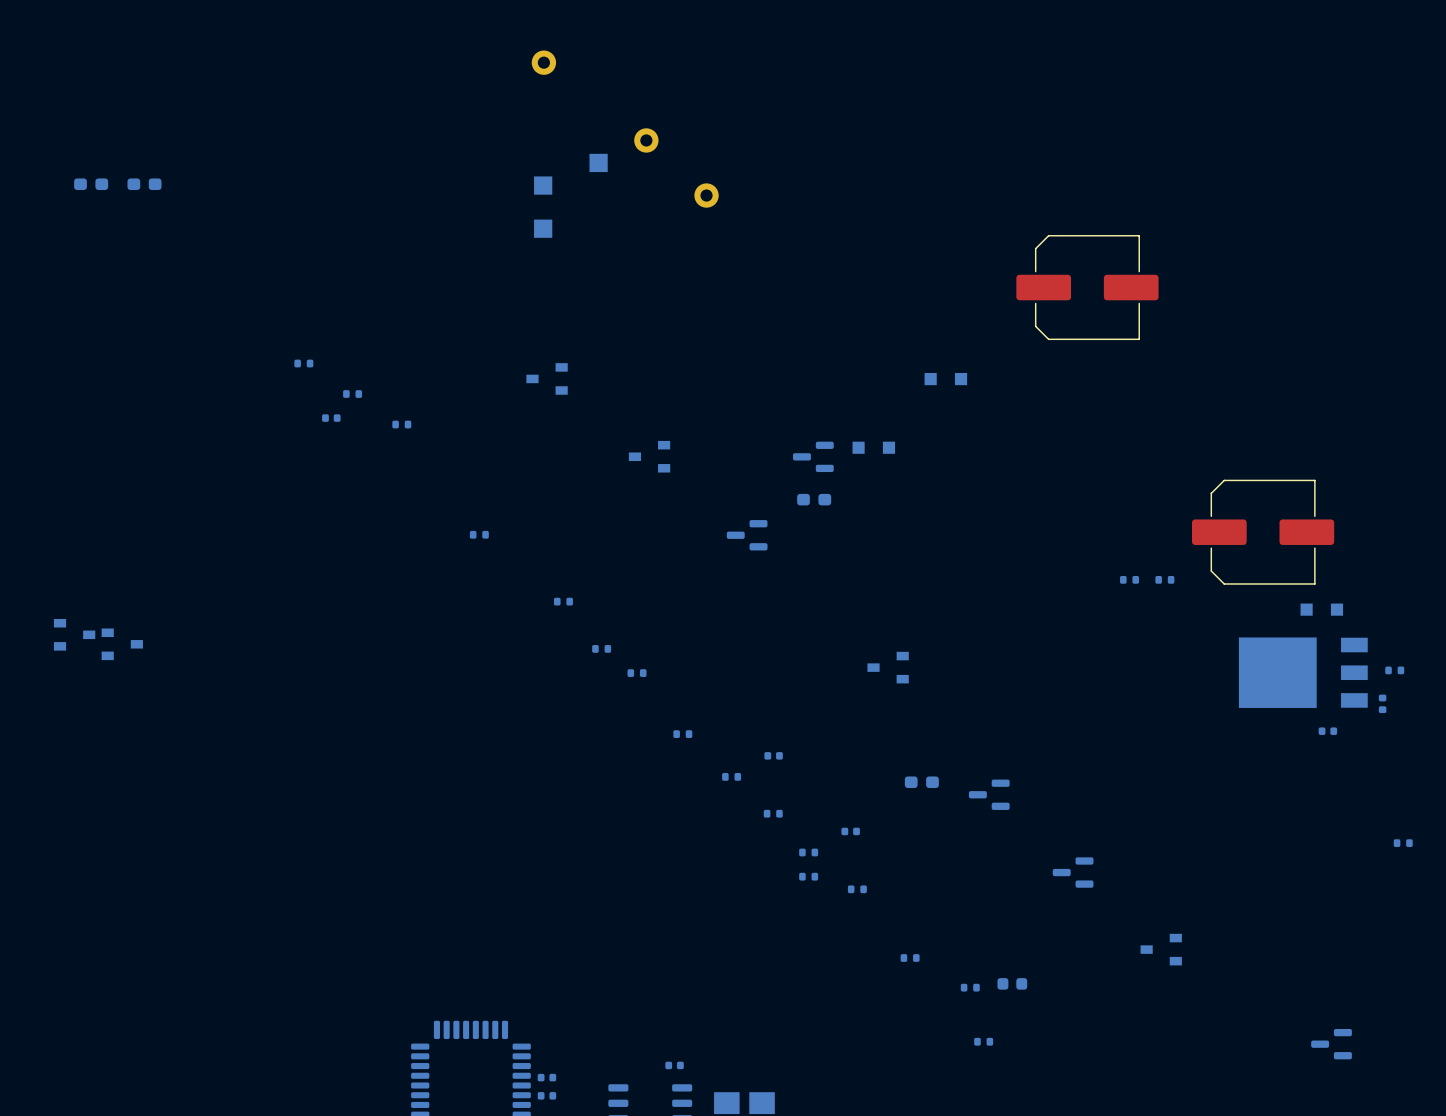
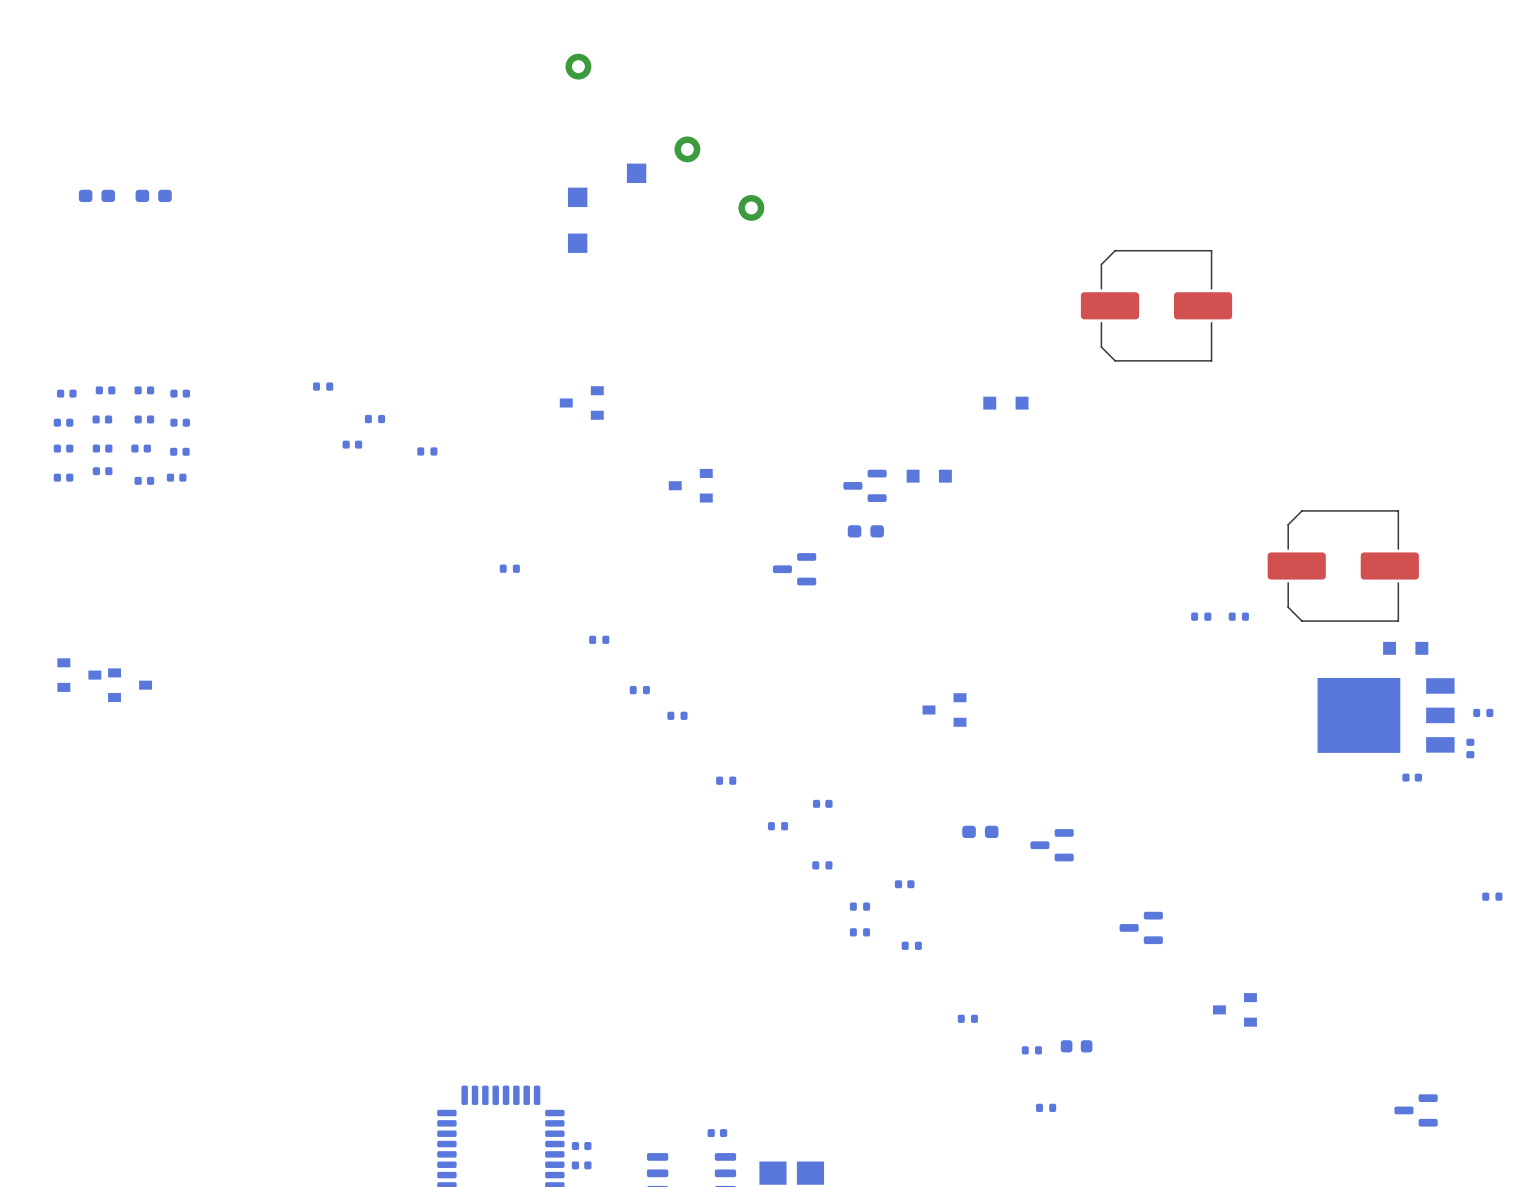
part: none -> (105, 390)
part: none -> (144, 390)
part: none -> (66, 393)
part: none -> (180, 393)
part: none -> (102, 419)
part: none -> (144, 419)
part: none -> (63, 422)
part: none -> (180, 422)
part: none -> (63, 448)
part: none -> (102, 448)
part: none -> (141, 448)
part: none -> (179, 451)
part: none -> (102, 471)
part: none -> (63, 477)
part: none -> (176, 477)
part: none -> (144, 480)

